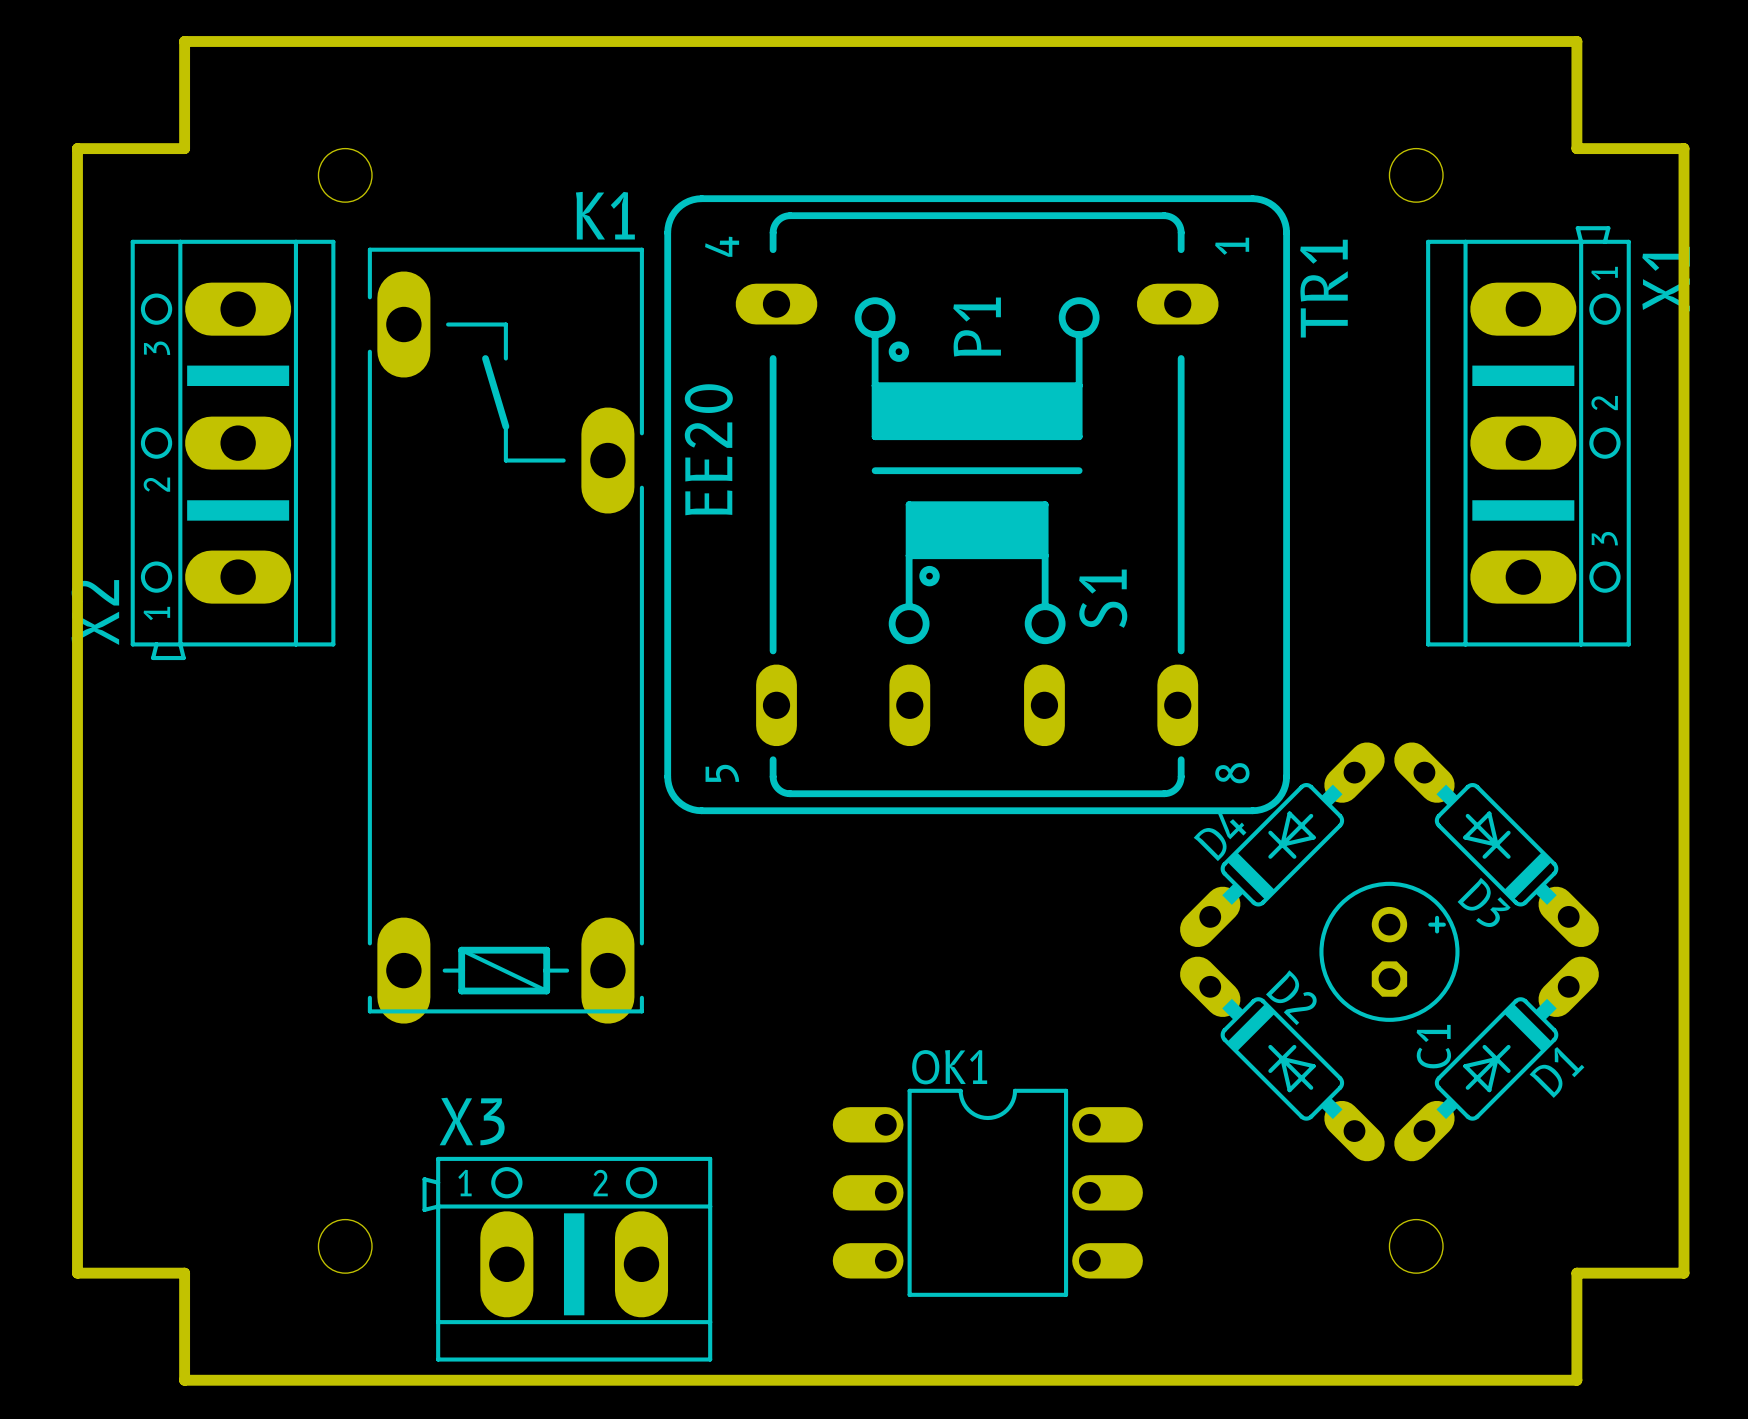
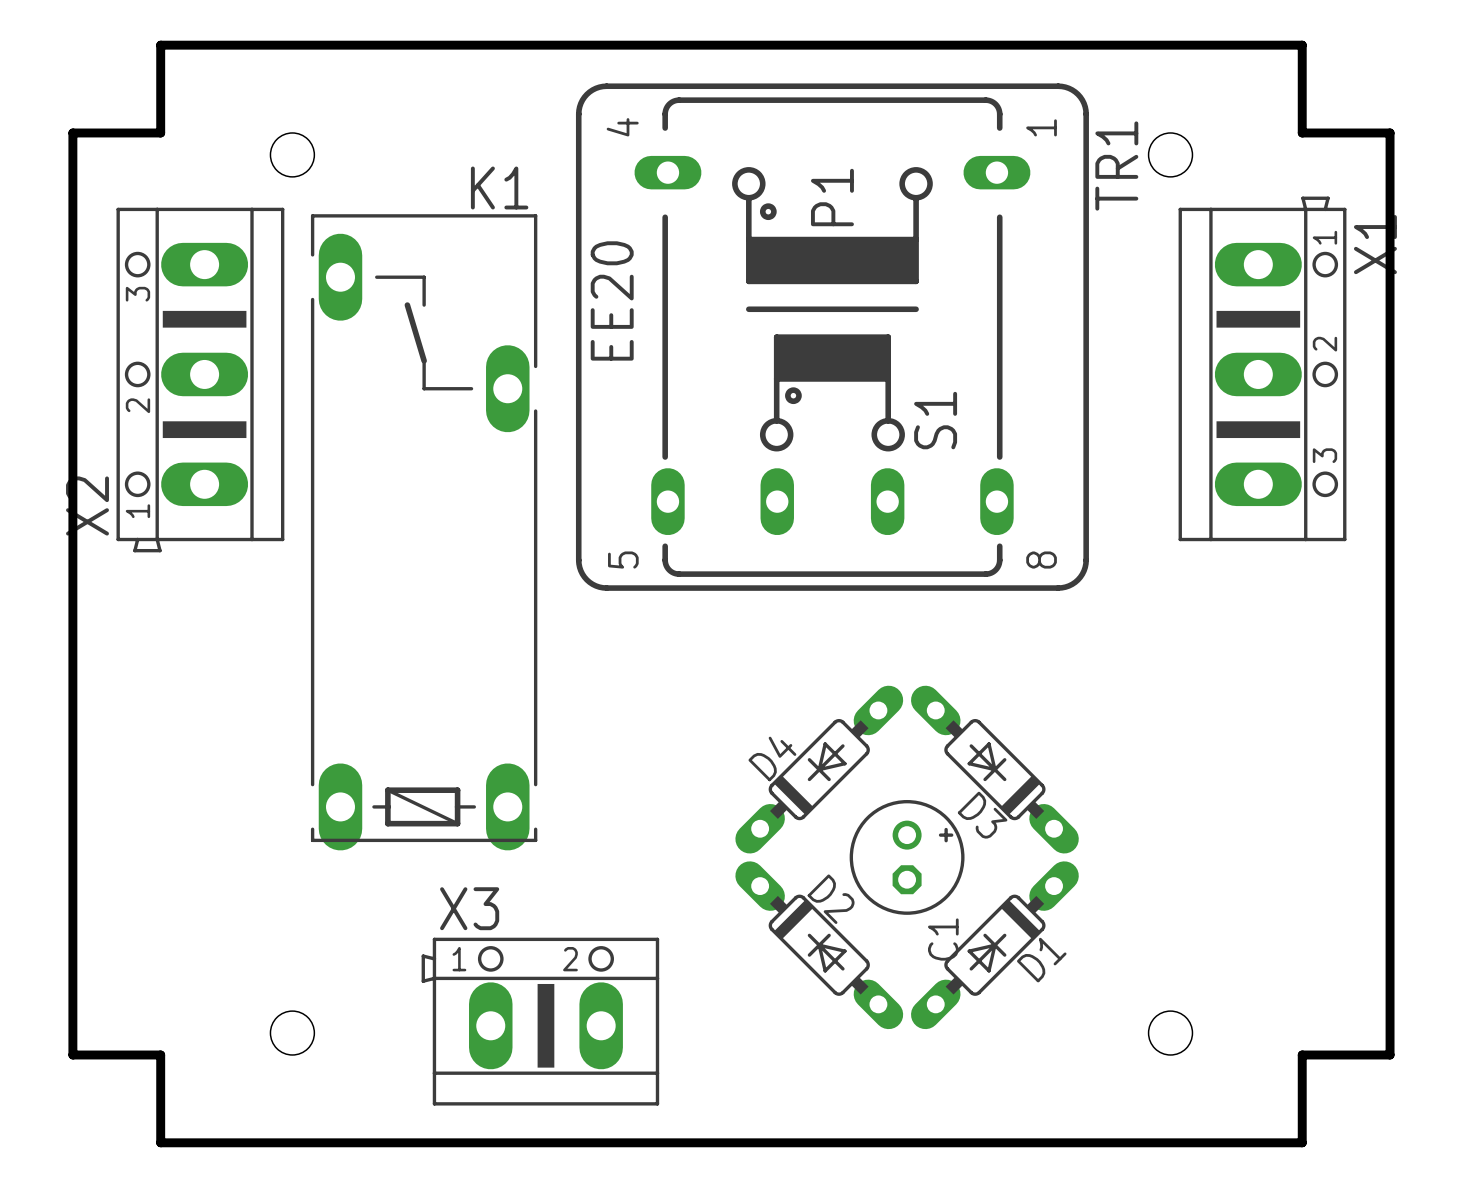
TR1 position: (977, 504) -> (832, 337)
D4 position: (1282, 844) -> (819, 769)
D3 position: (1496, 844) -> (994, 769)
C1 position: (1389, 951) -> (907, 857)
D2 position: (1282, 1058) -> (819, 945)
D1 position: (1496, 1058) -> (994, 945)
OK1: (987, 1192) -> none
X3 position: (567, 1259) -> (540, 1021)

